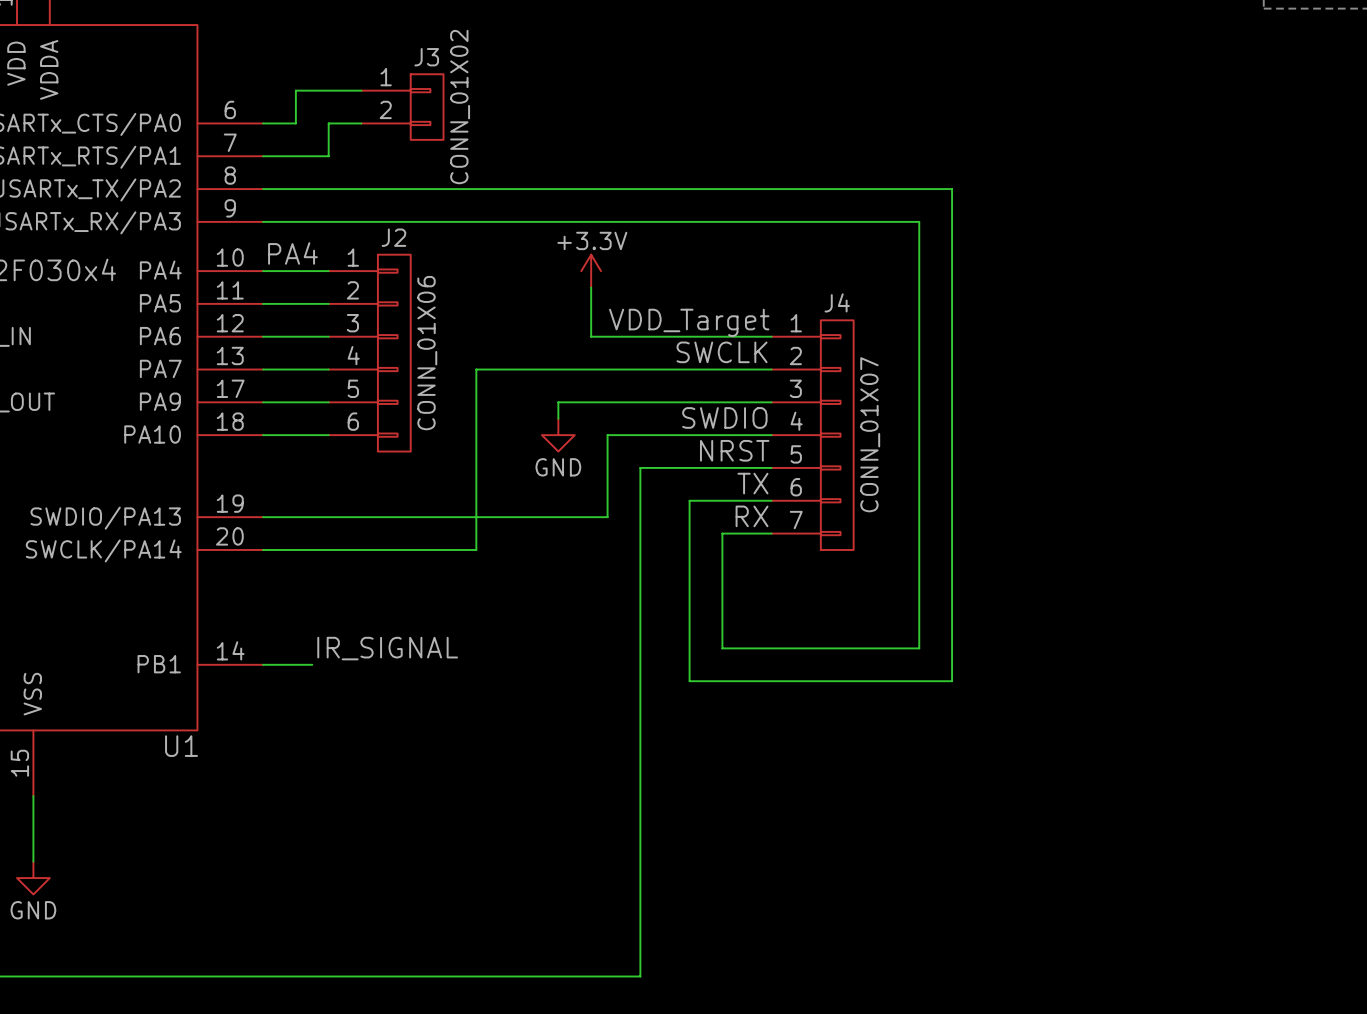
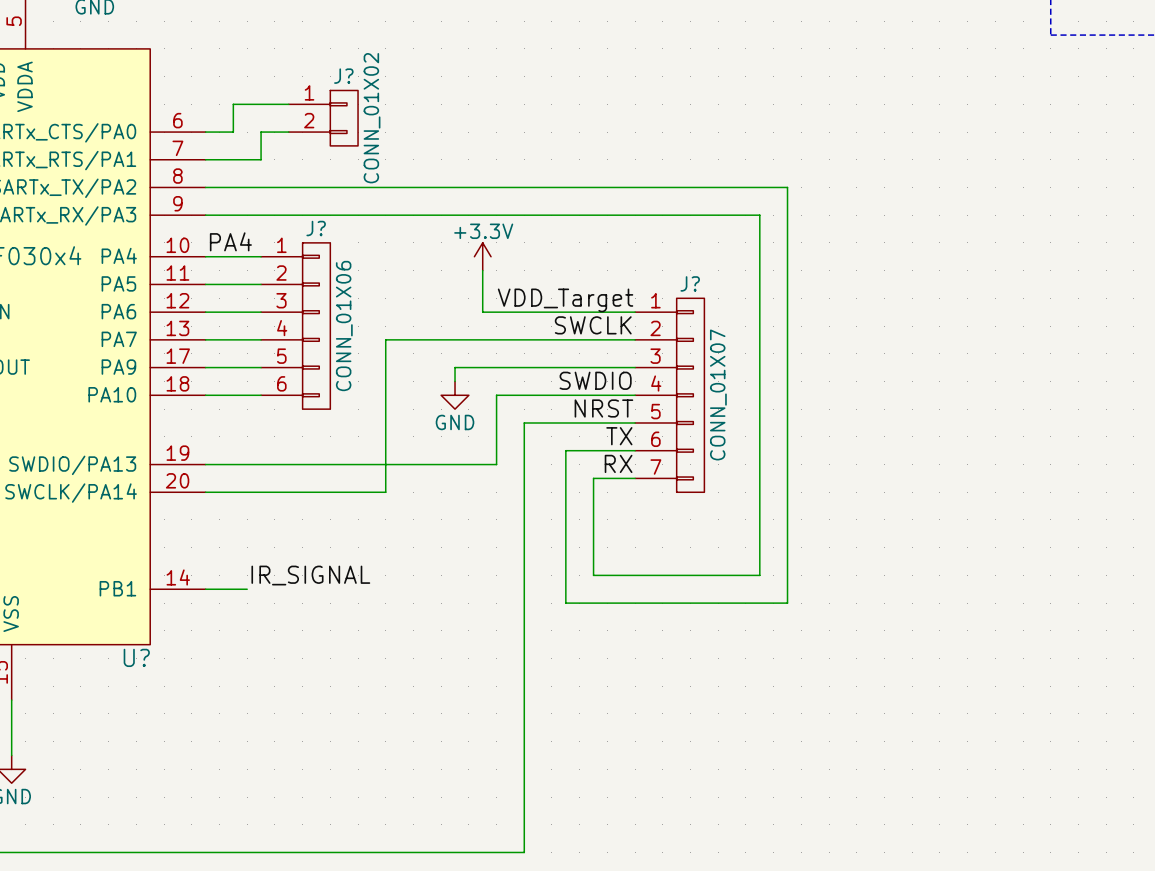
J3 name: J3 (426, 57) -> J? (343, 76)
J2 name: J2 (393, 237) -> J? (316, 228)
J4 name: J4 (837, 302) -> J? (690, 283)
U1 name: U1 (181, 746) -> U? (136, 657)

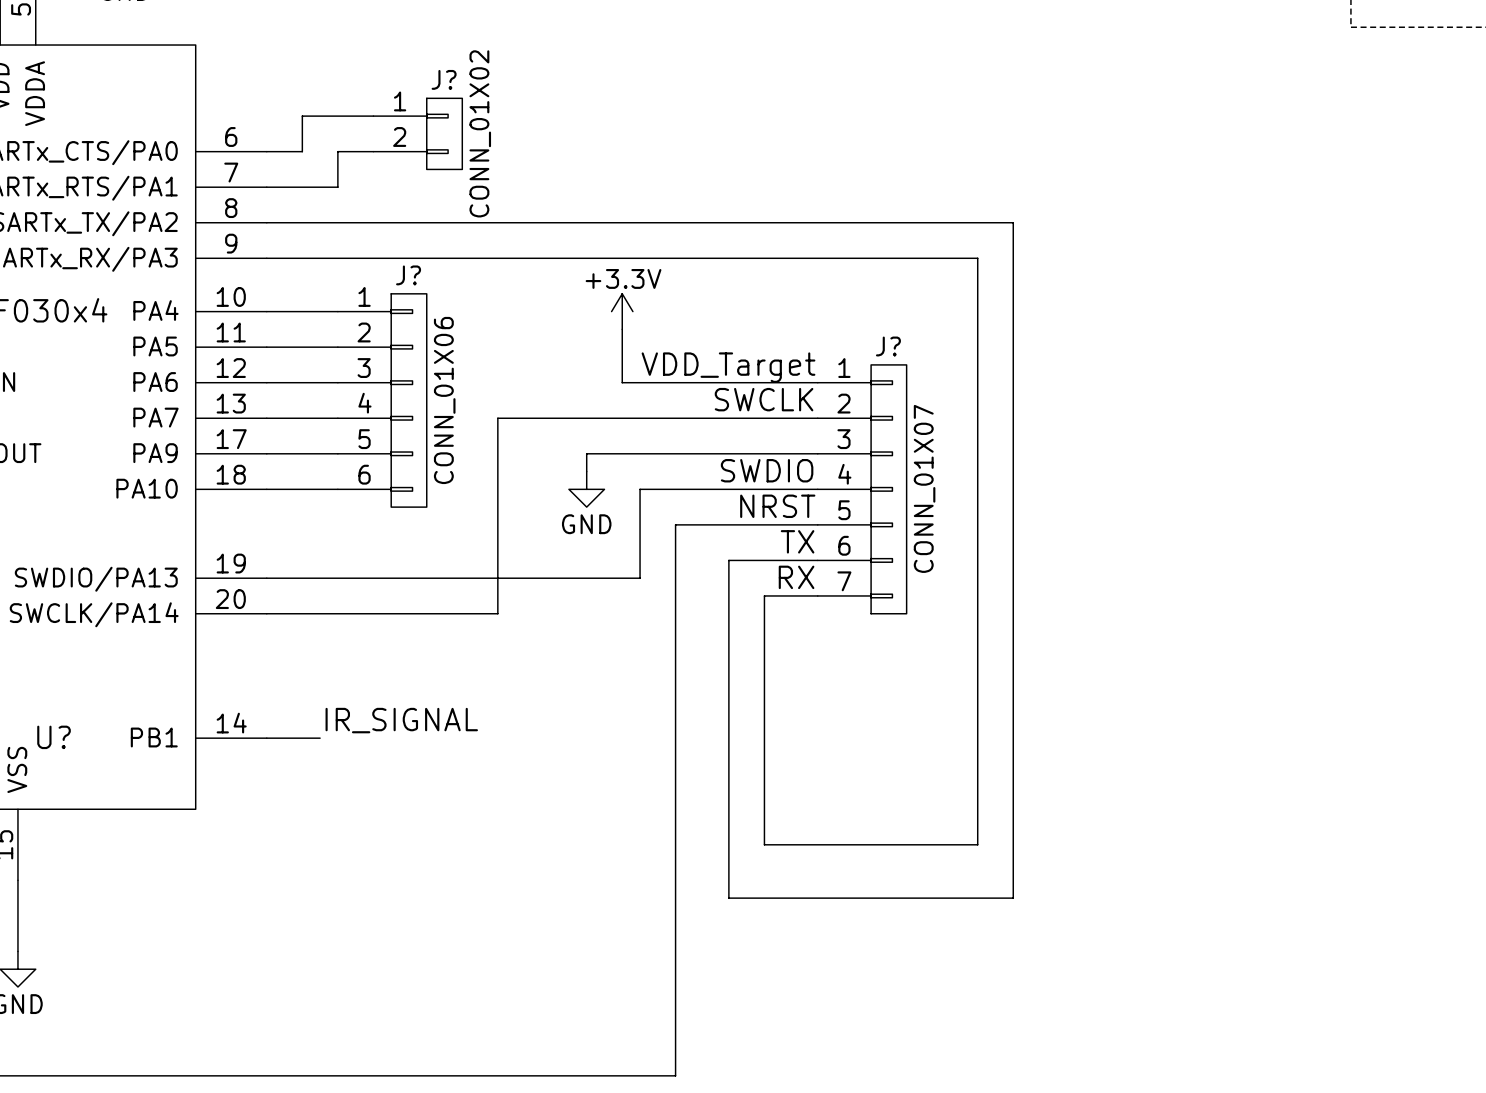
label: PA4 (230, 241) -> none
wire: (593, 575) (759, 575) -> (764, 720) (764, 844) (977, 844) (977, 720)
wire: (565, 603) (787, 603) -> (728, 755) (728, 898) (1013, 898) (1013, 755)
U? name position: U? (136, 657) -> U? (54, 737)

